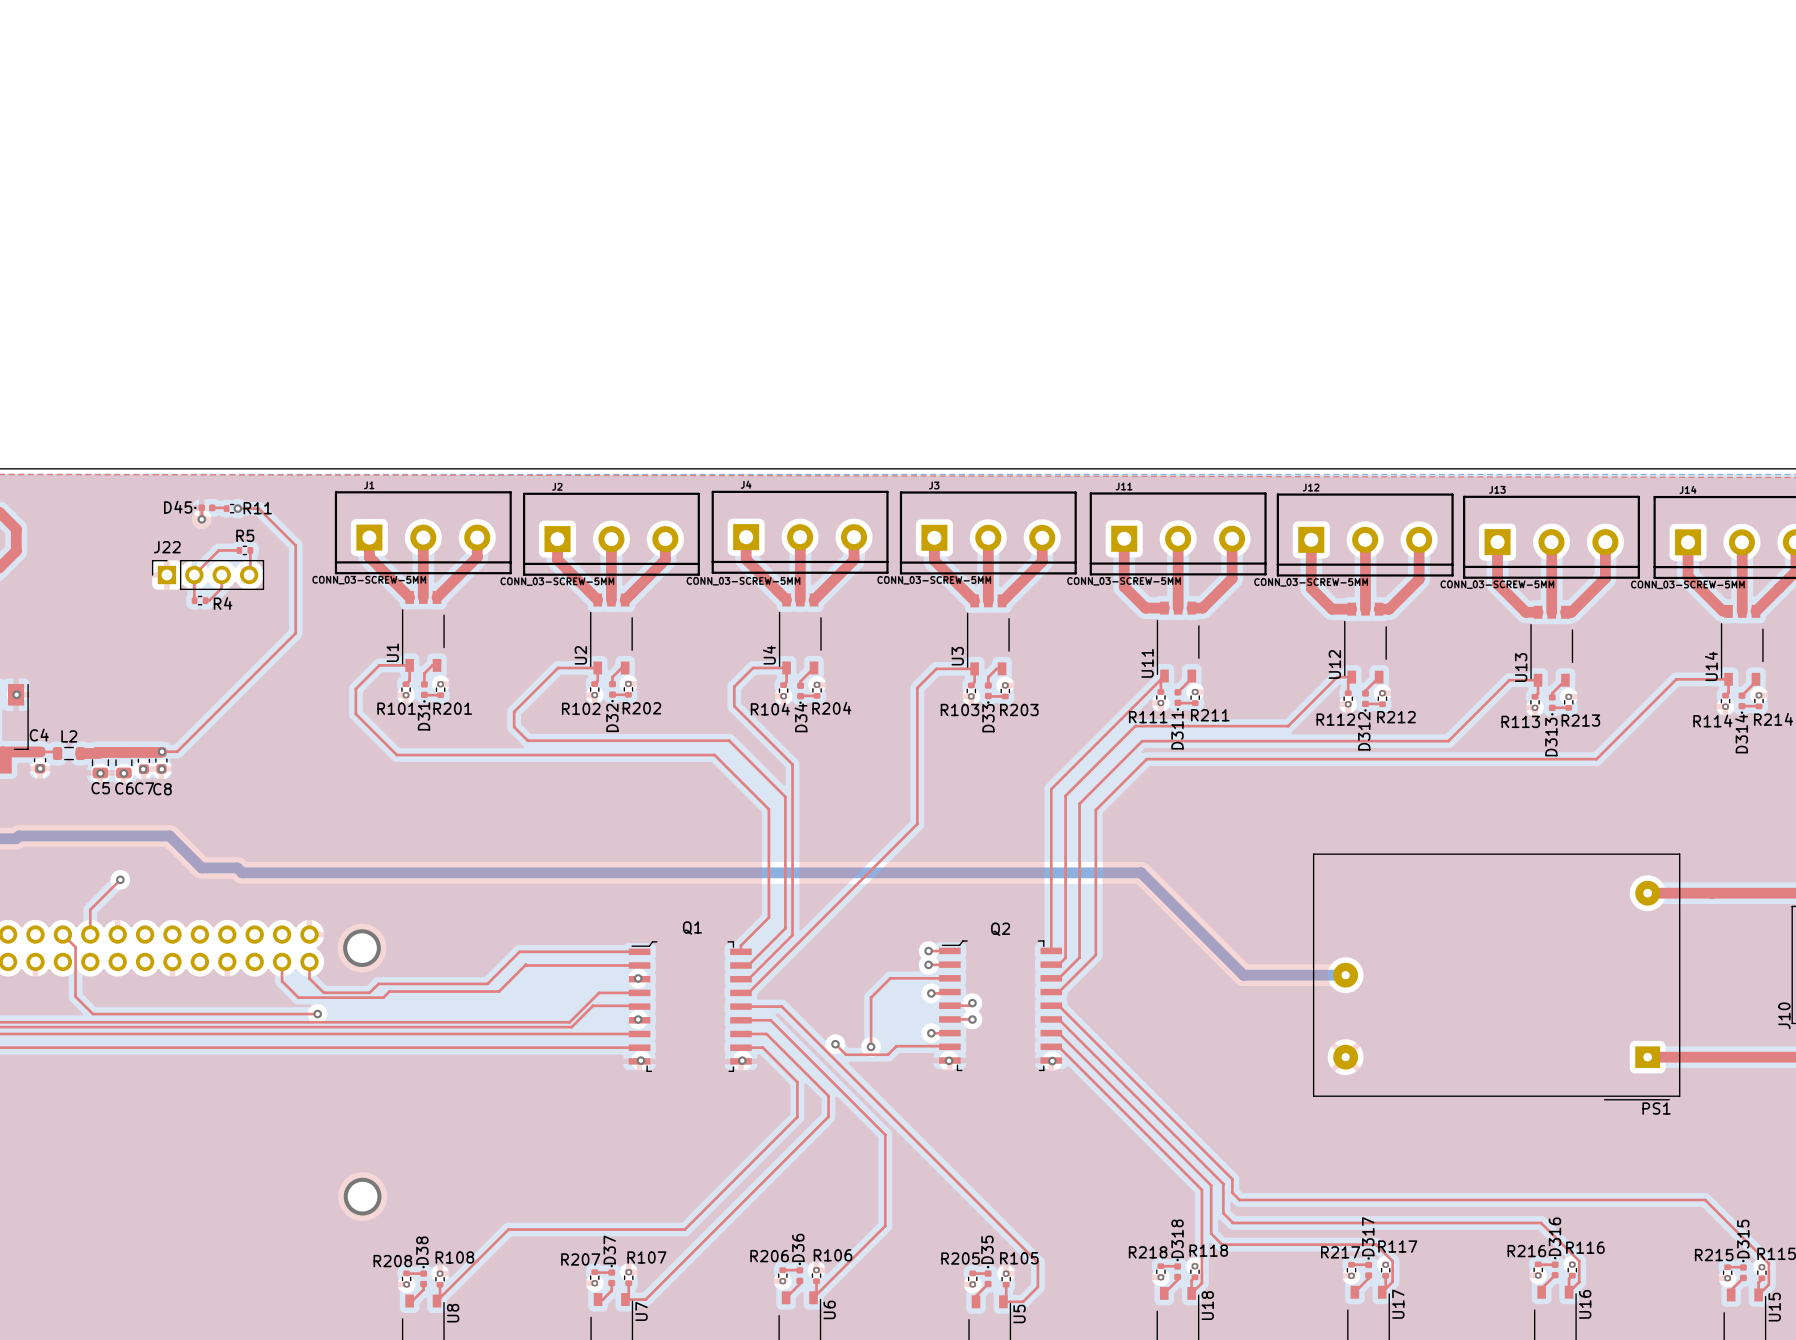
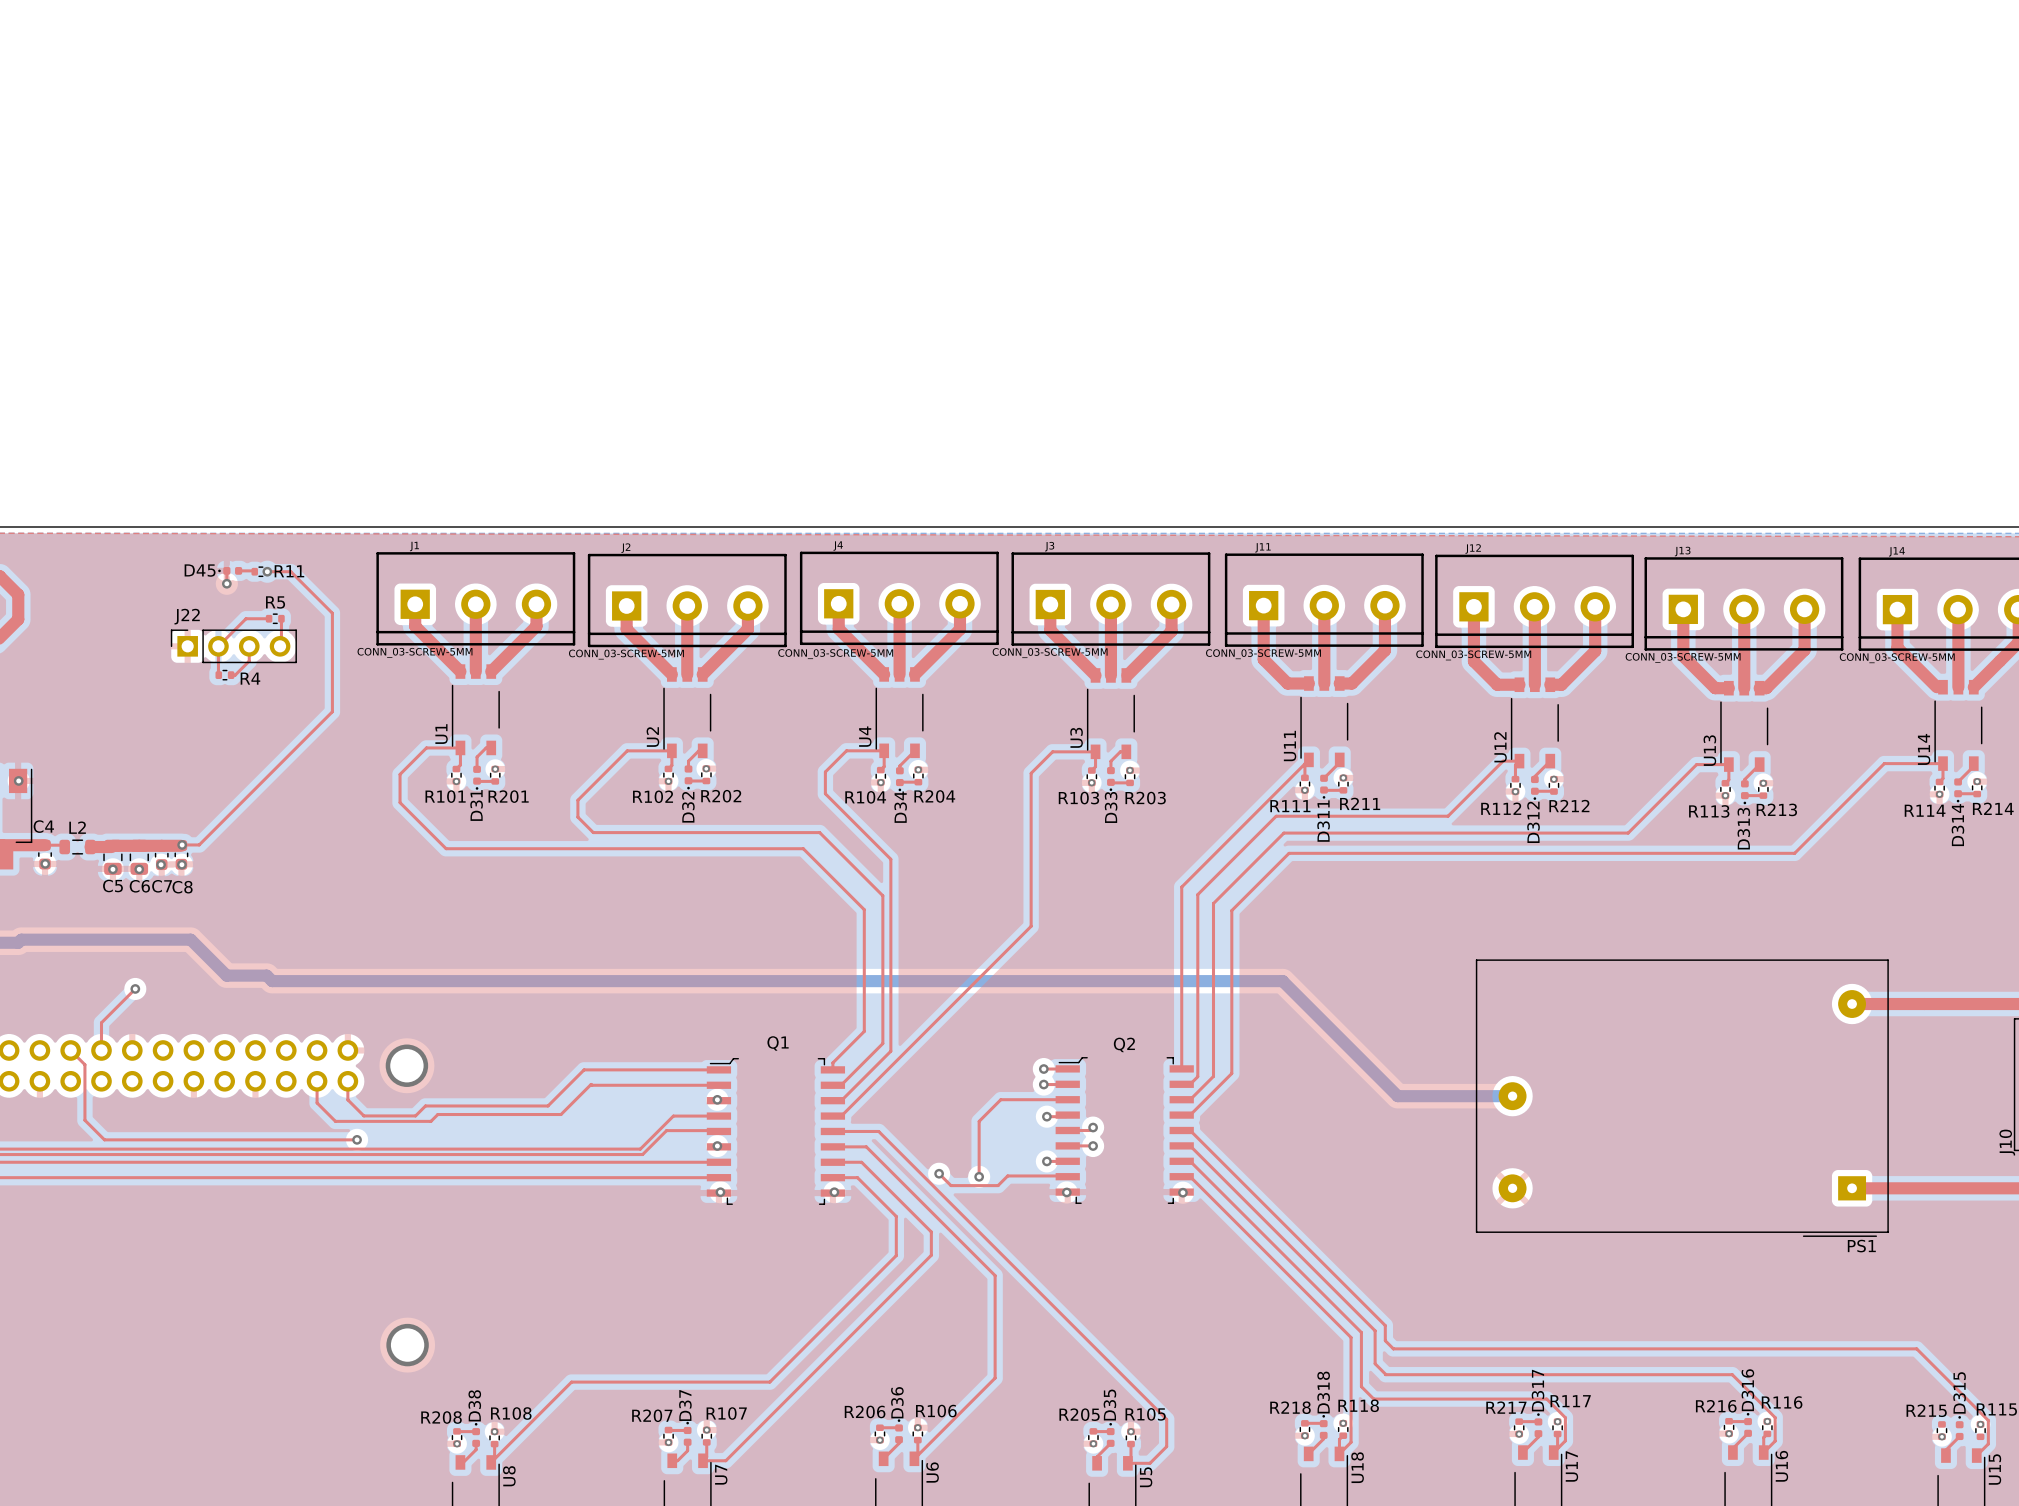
top track: (1727, 1267) (1743, 1267) -> none
top track: (1761, 1278) (1758, 1282) (1758, 1294) -> none

